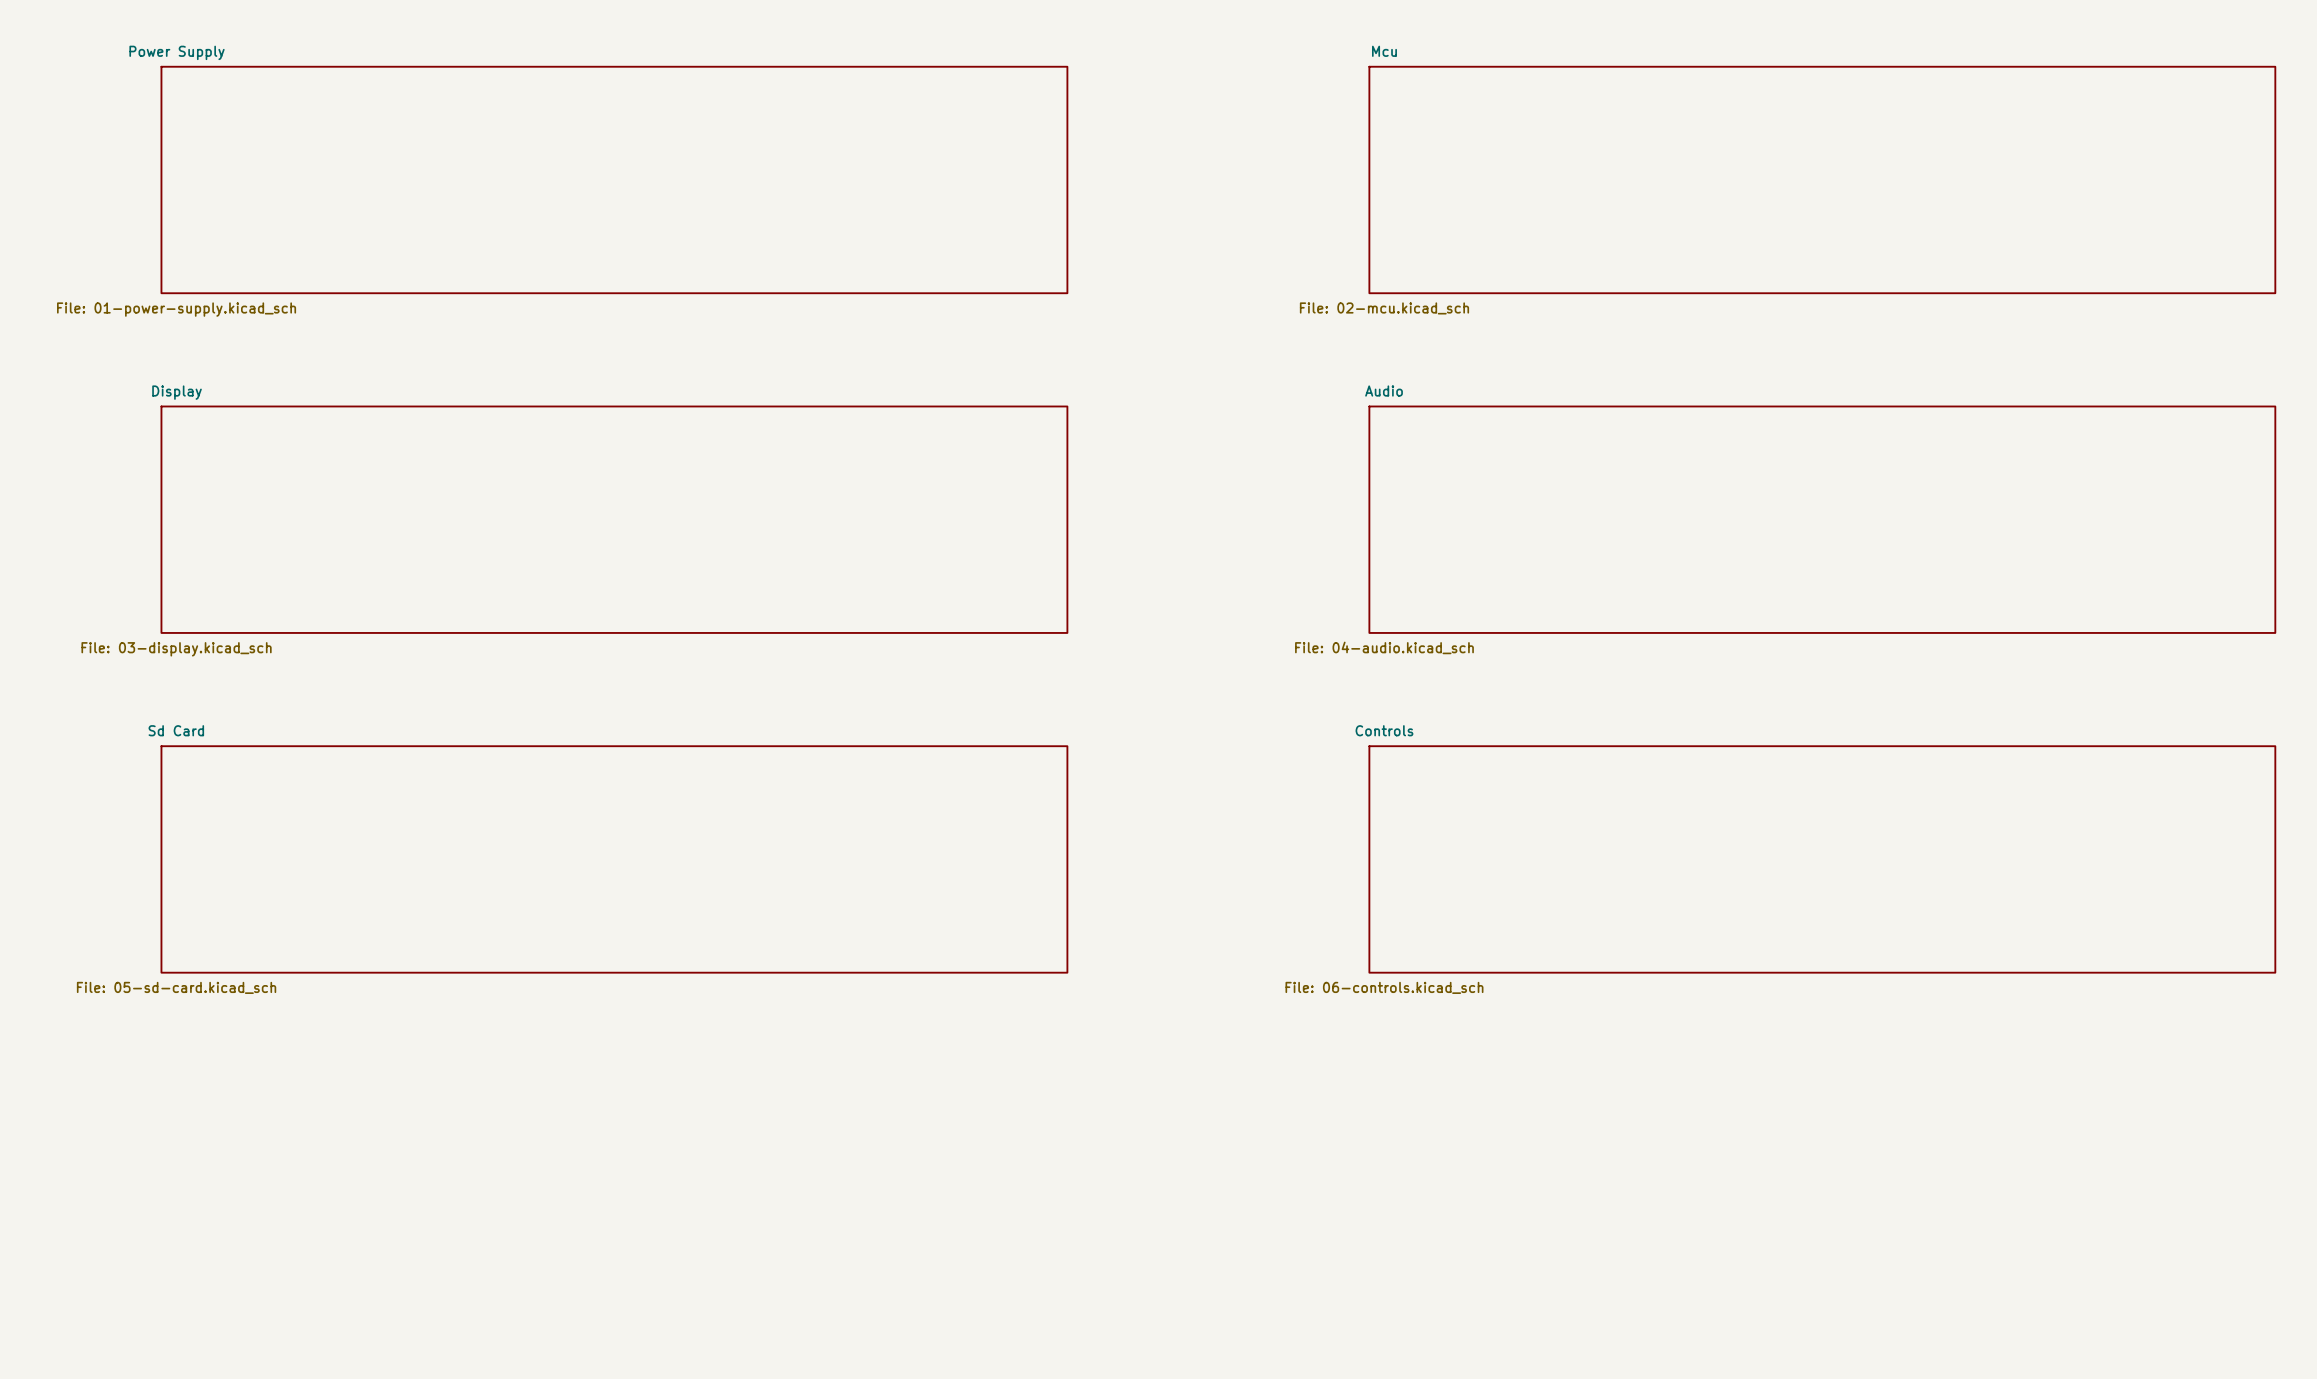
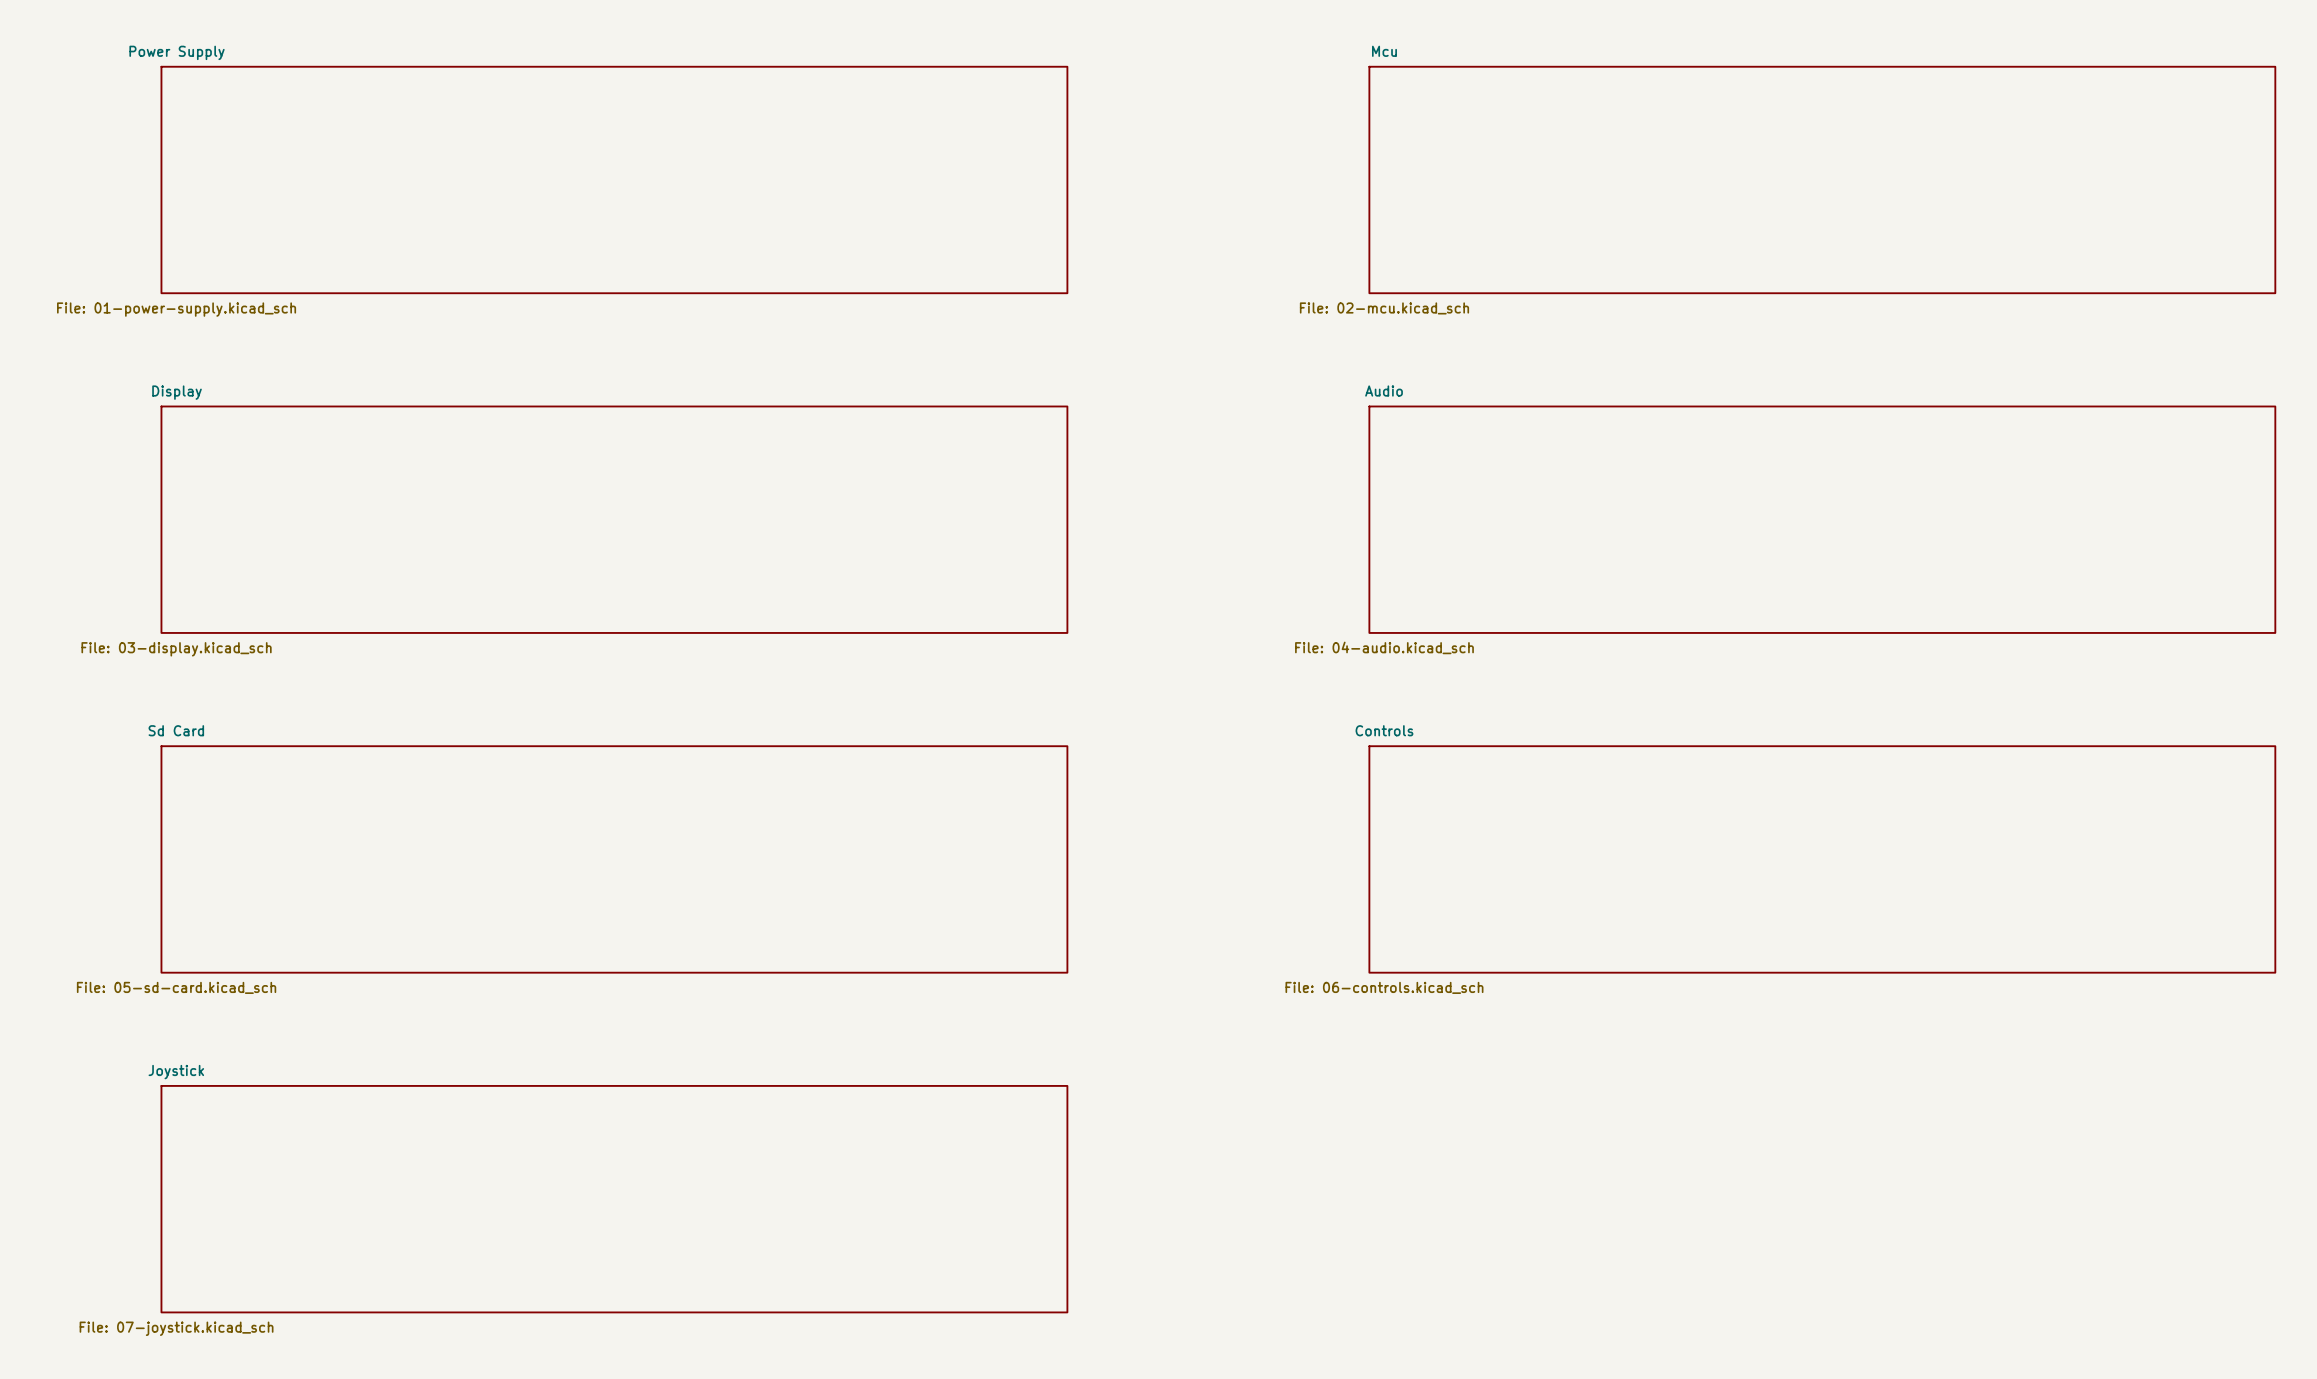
sheet Joystick: none -> File: 07-joystick.kicad_sch (614, 1199)

